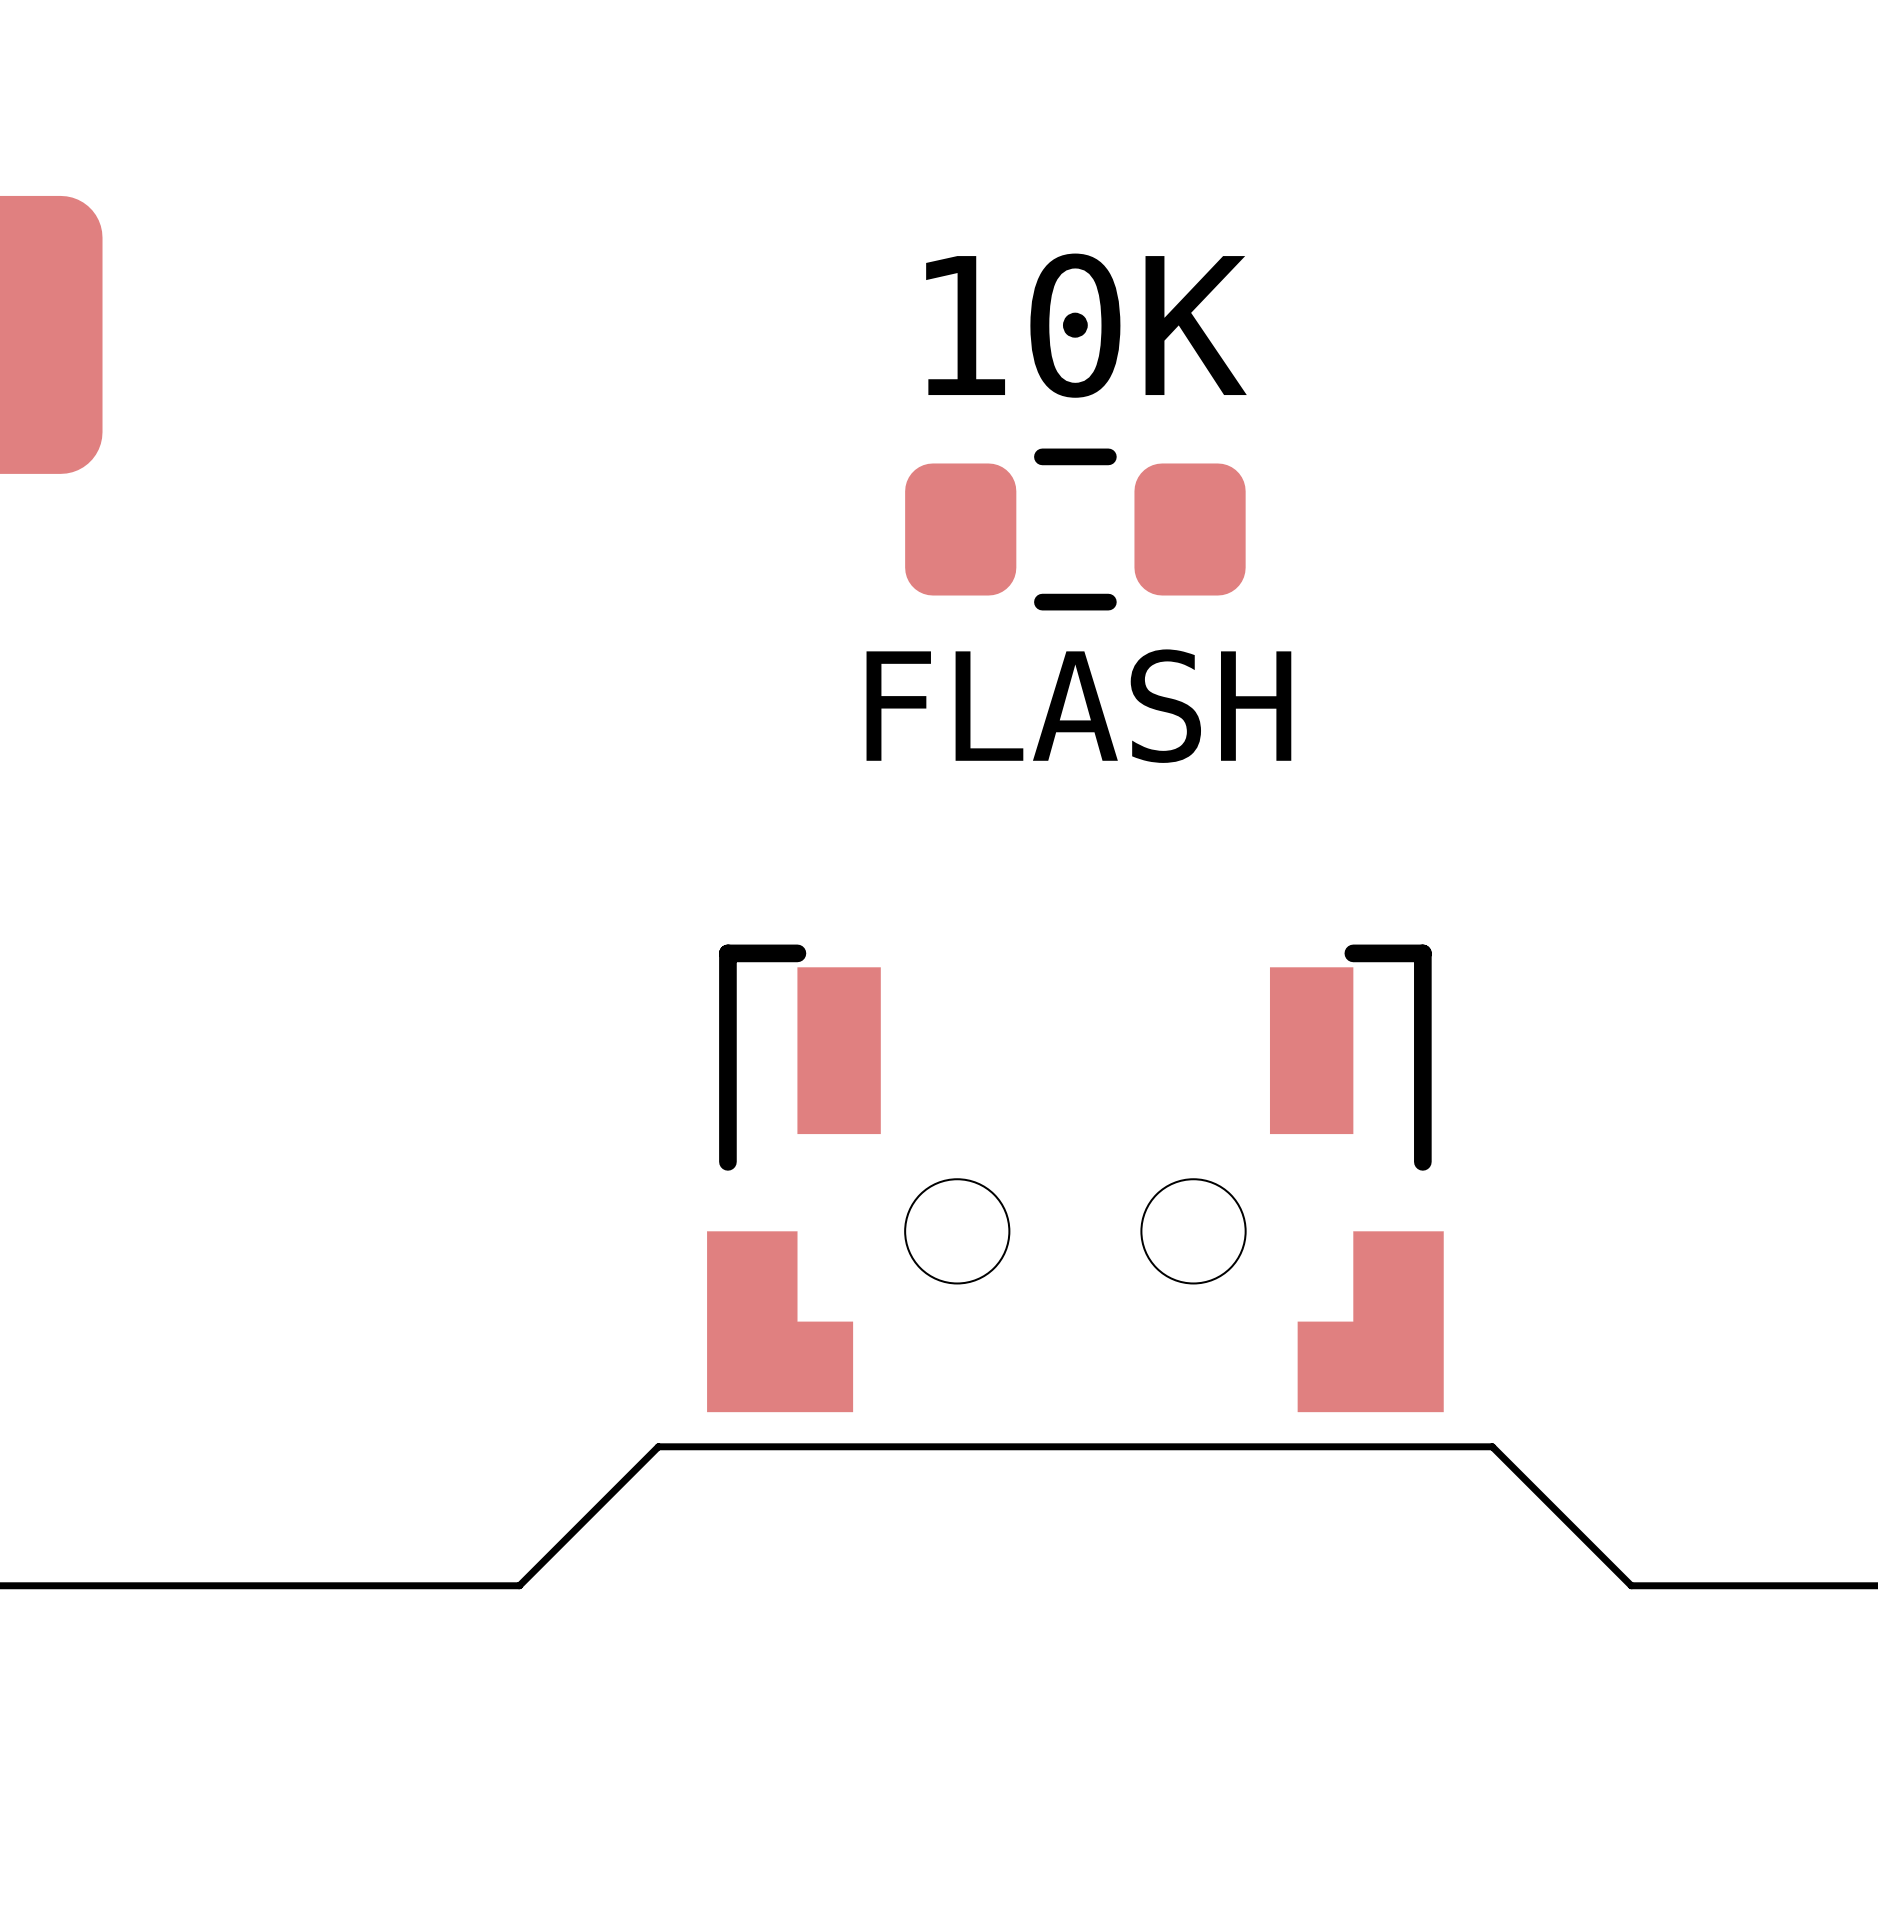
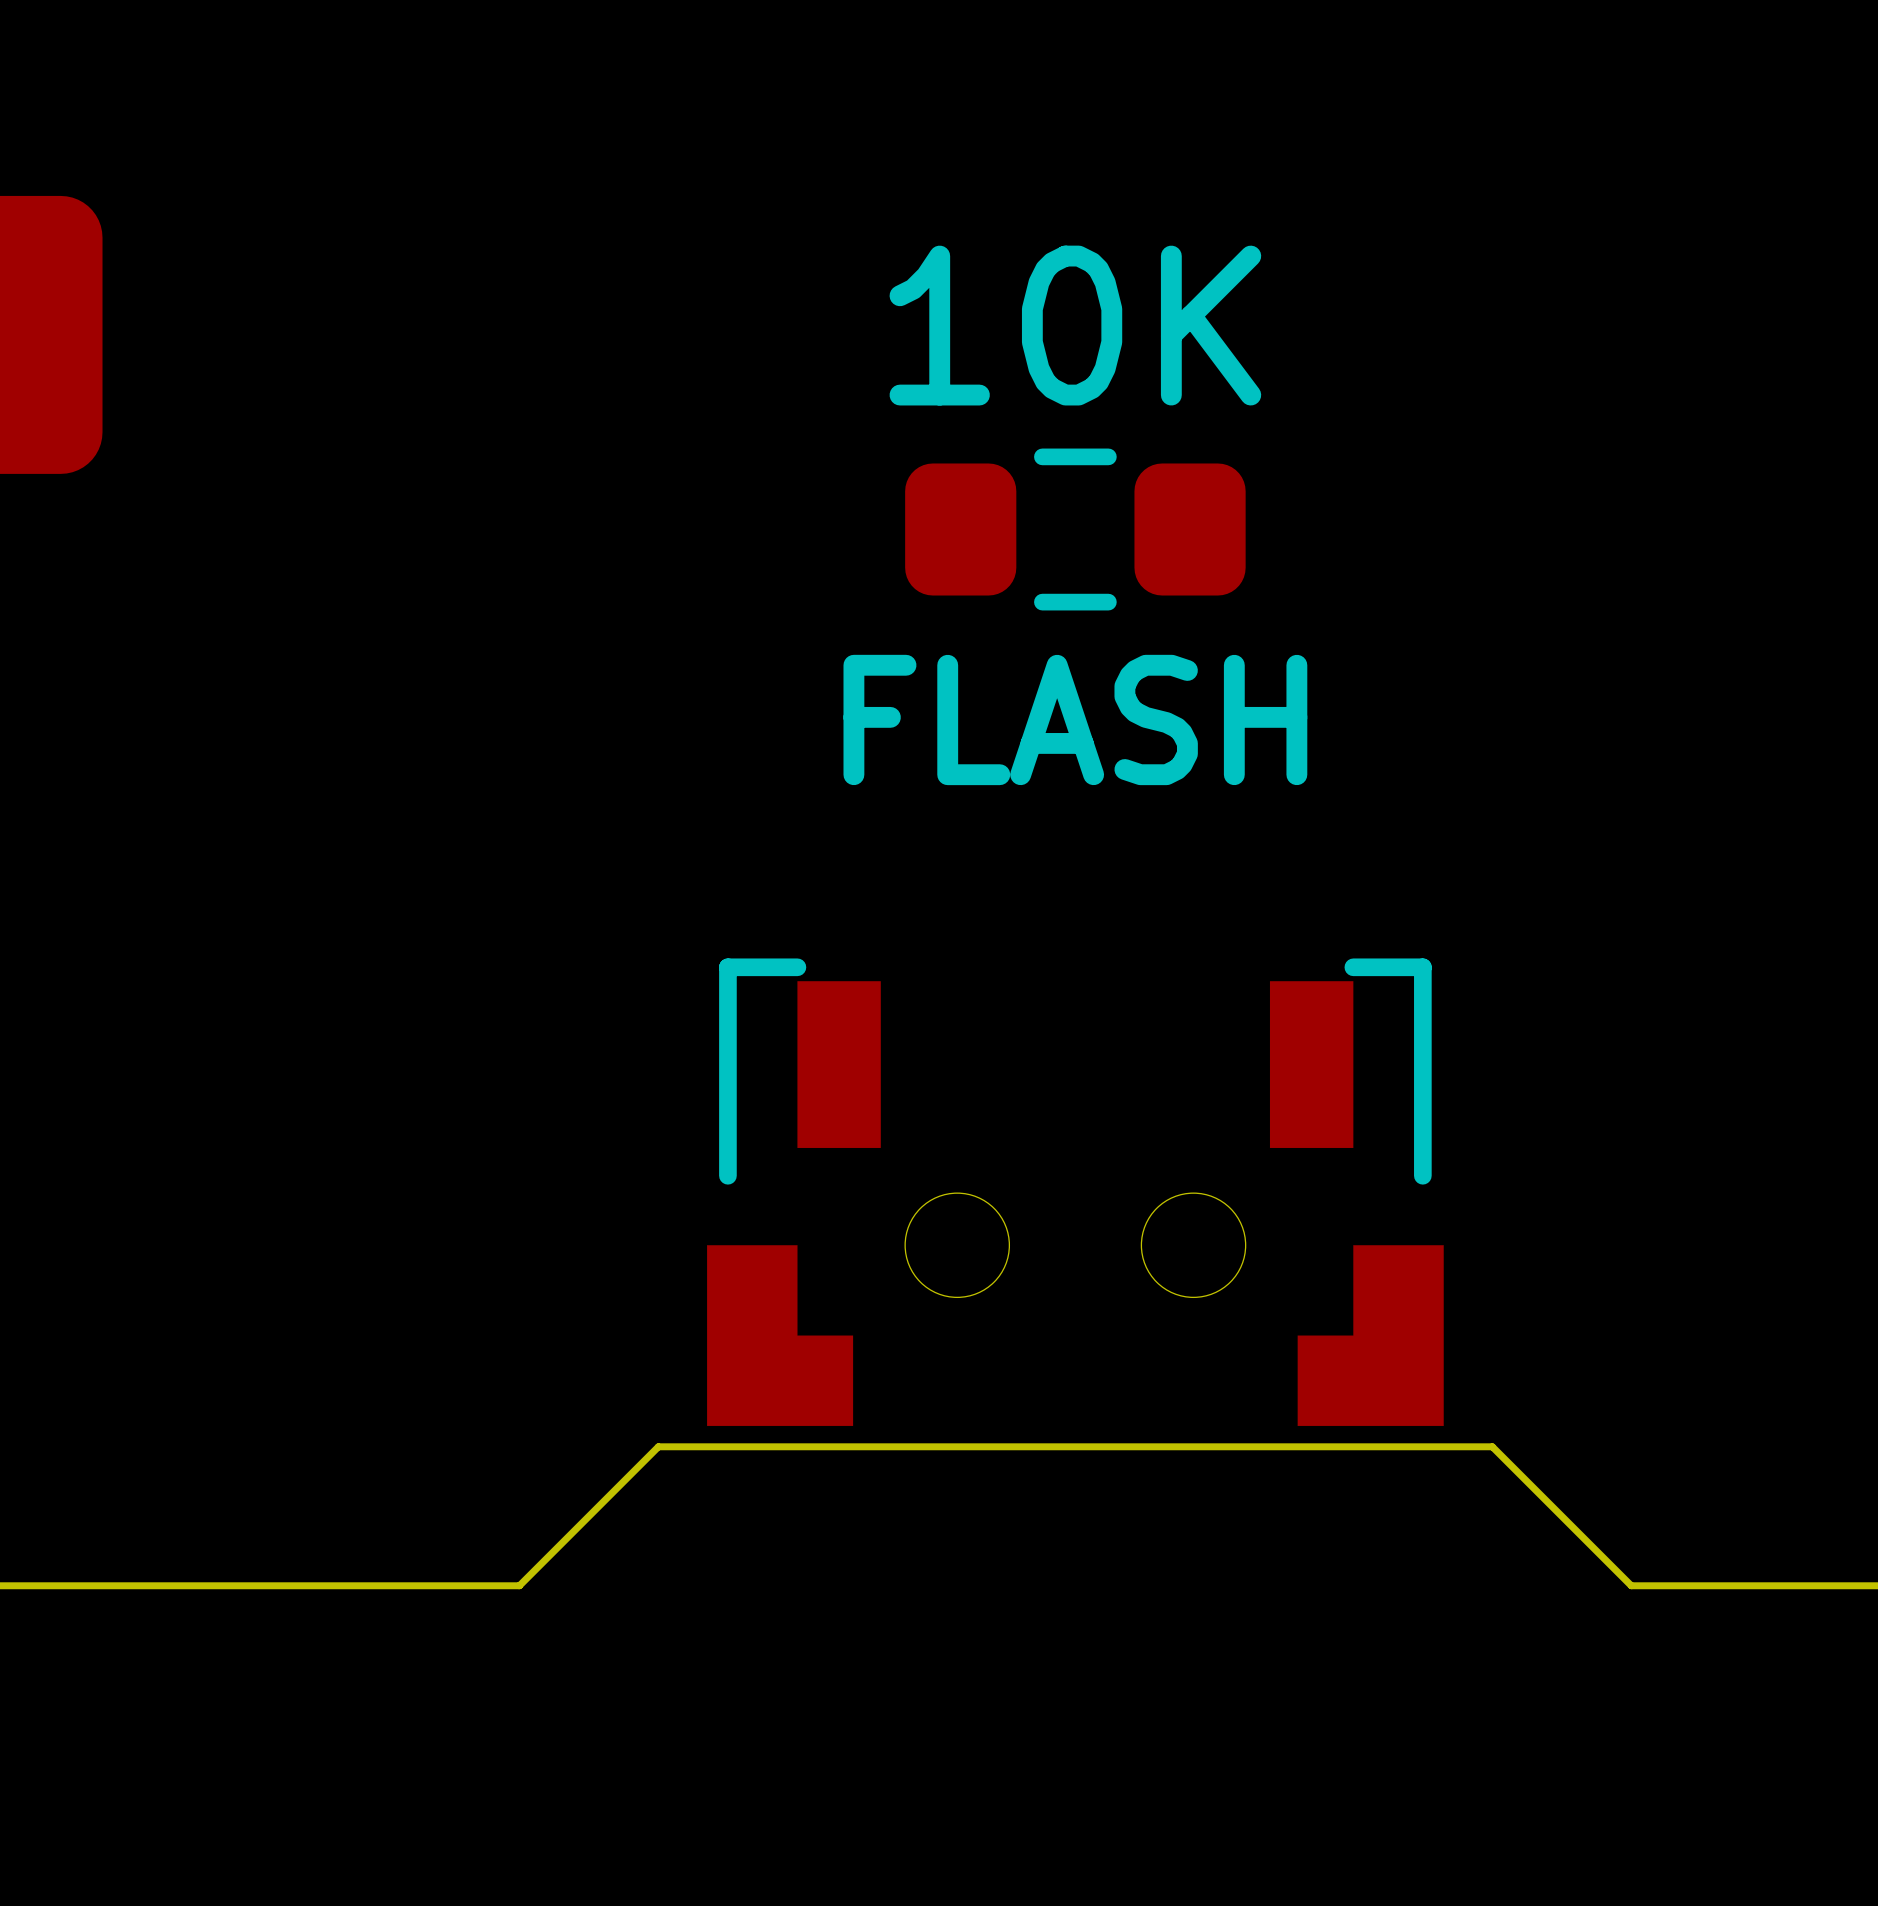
part position: (1075, 1178) -> (1075, 1192)

